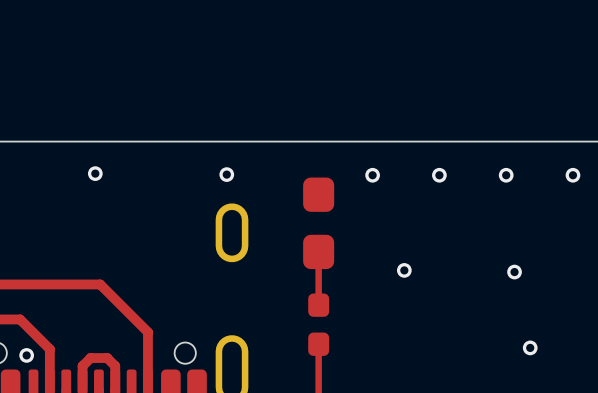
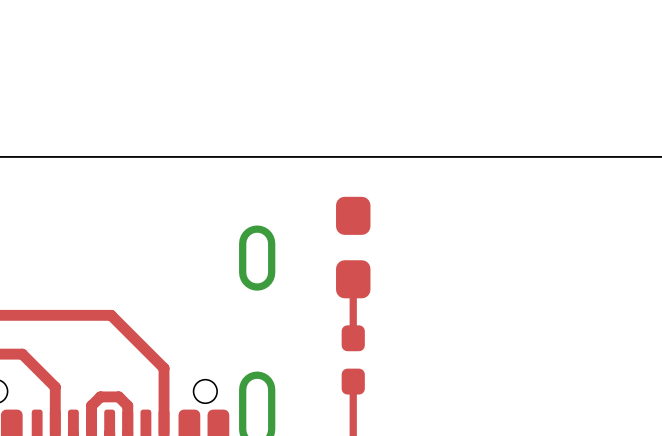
via: (95, 173) -> none
via: (226, 174) -> none
via: (372, 175) -> none
via: (439, 175) -> none
via: (506, 175) -> none
via: (572, 175) -> none
via: (404, 270) -> none
via: (514, 272) -> none
via: (530, 347) -> none
via: (26, 355) -> none

